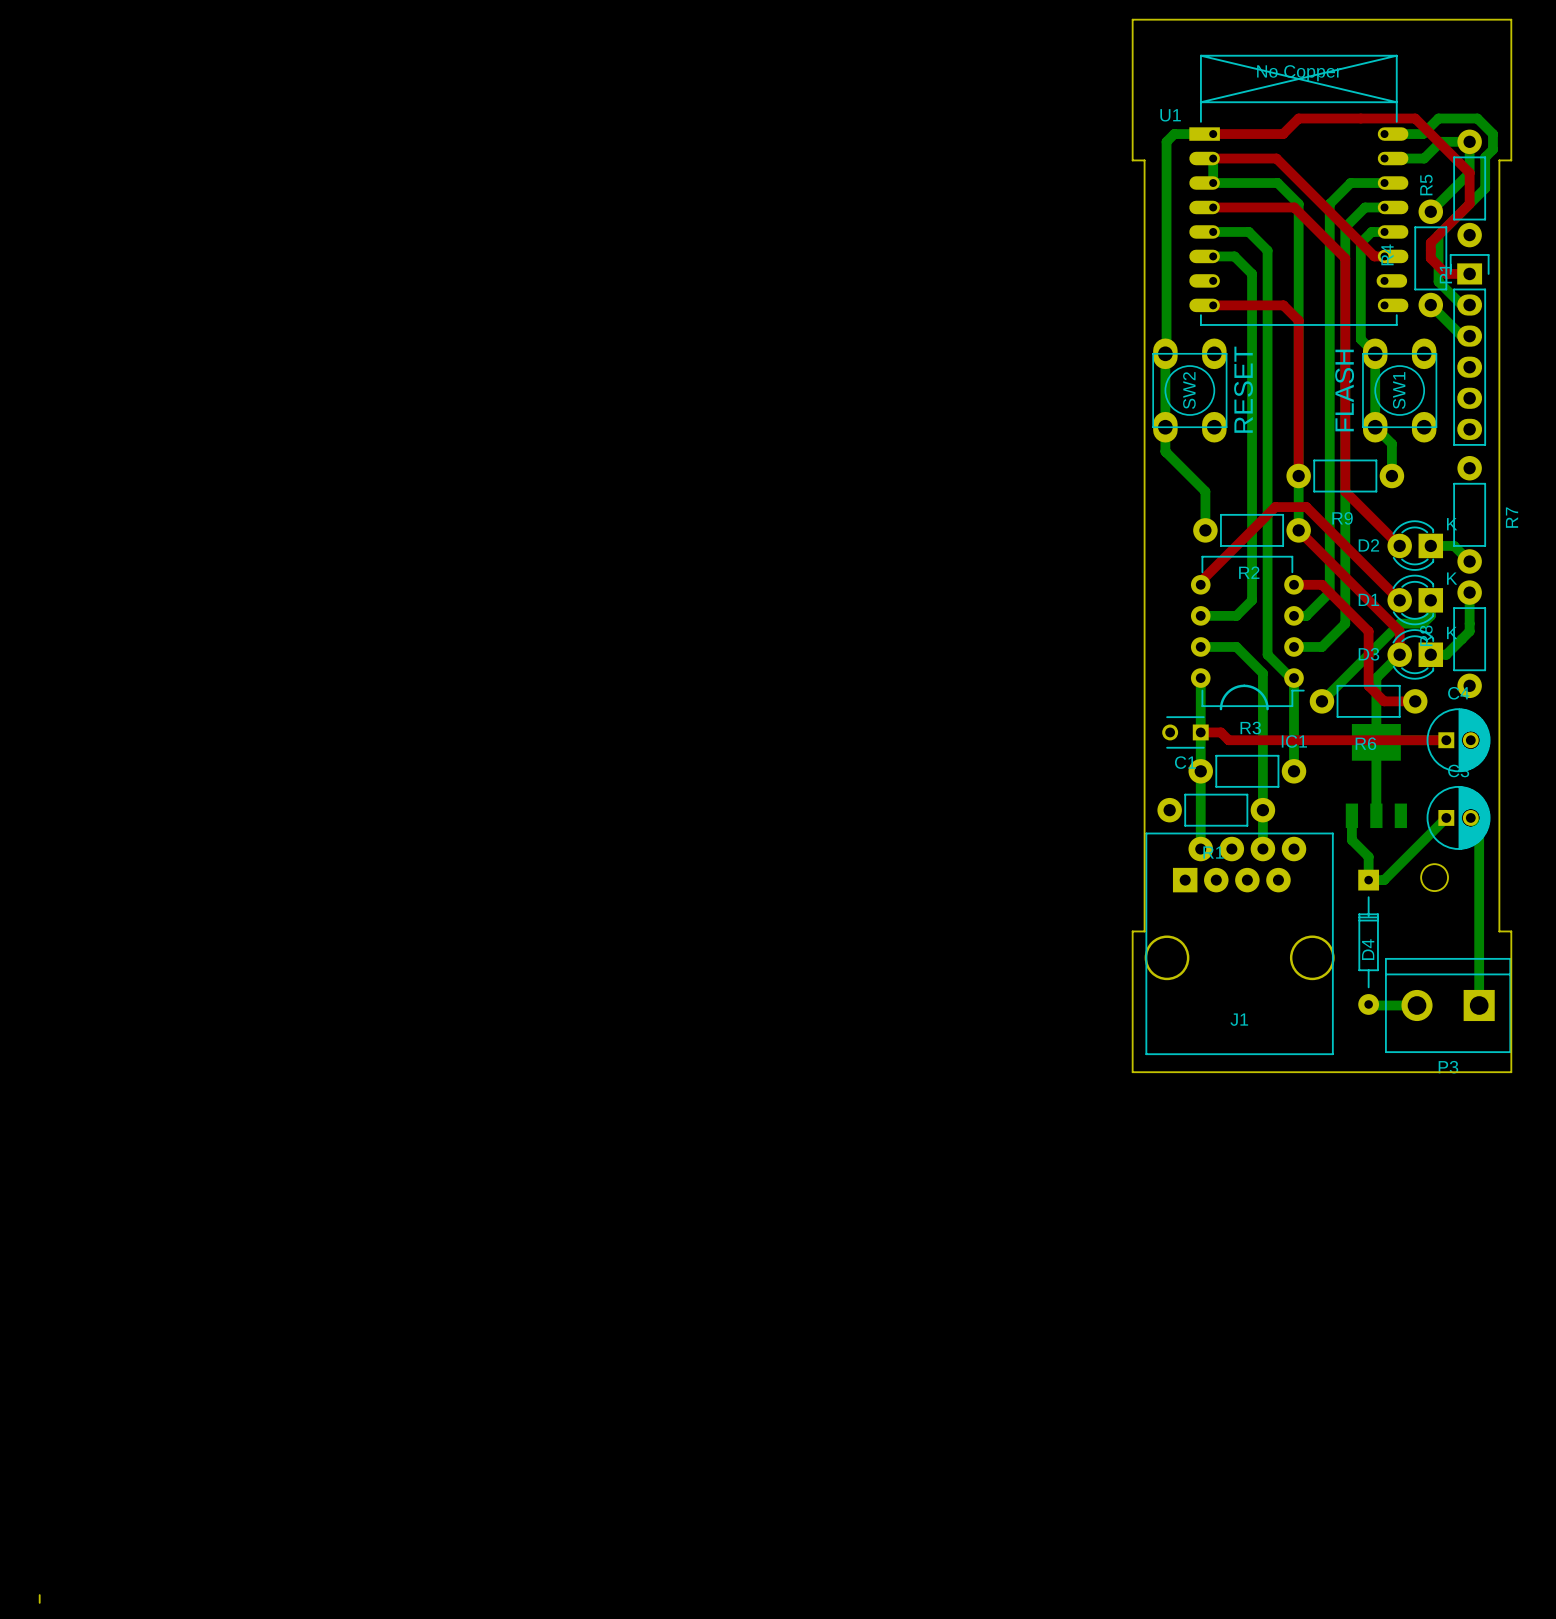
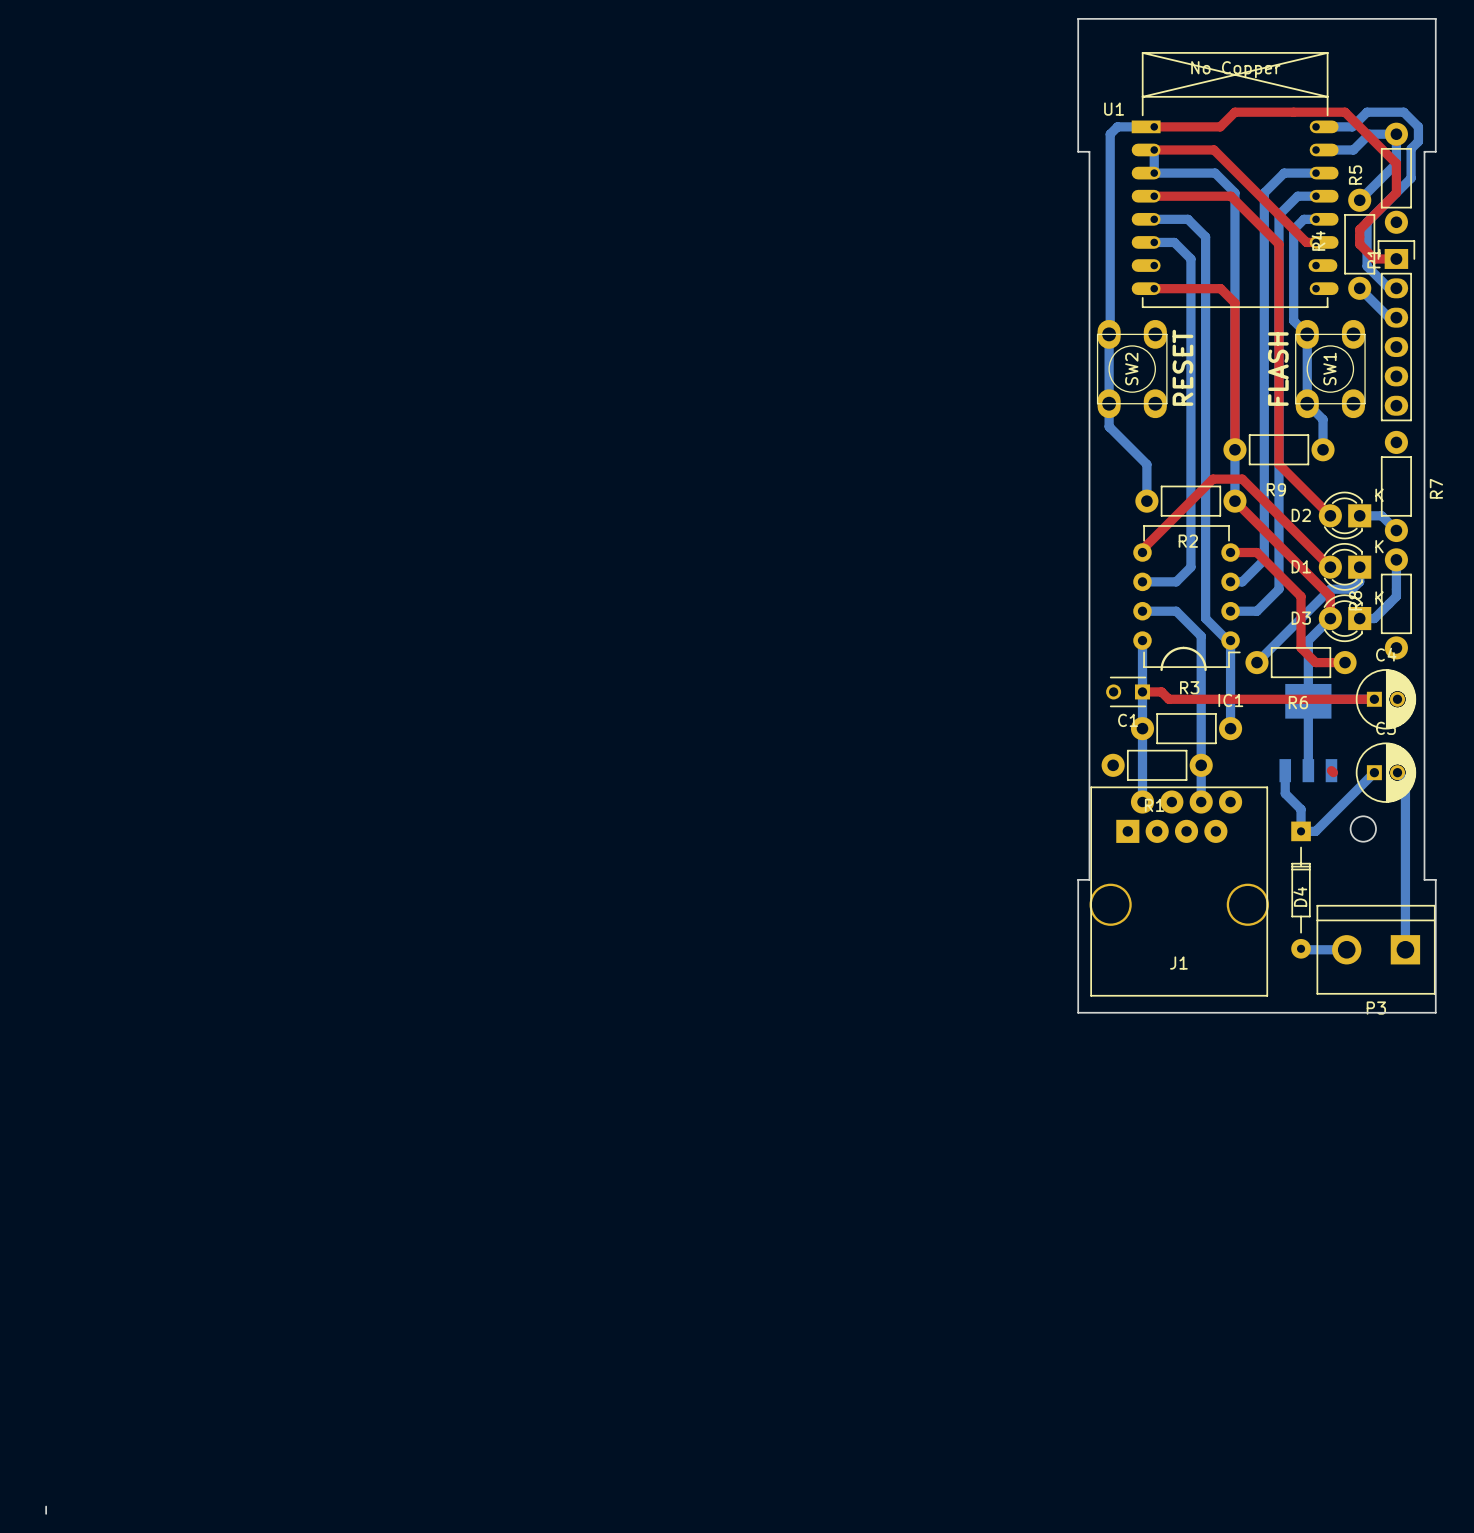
top track: none -> (1331, 770) (1333, 772)

